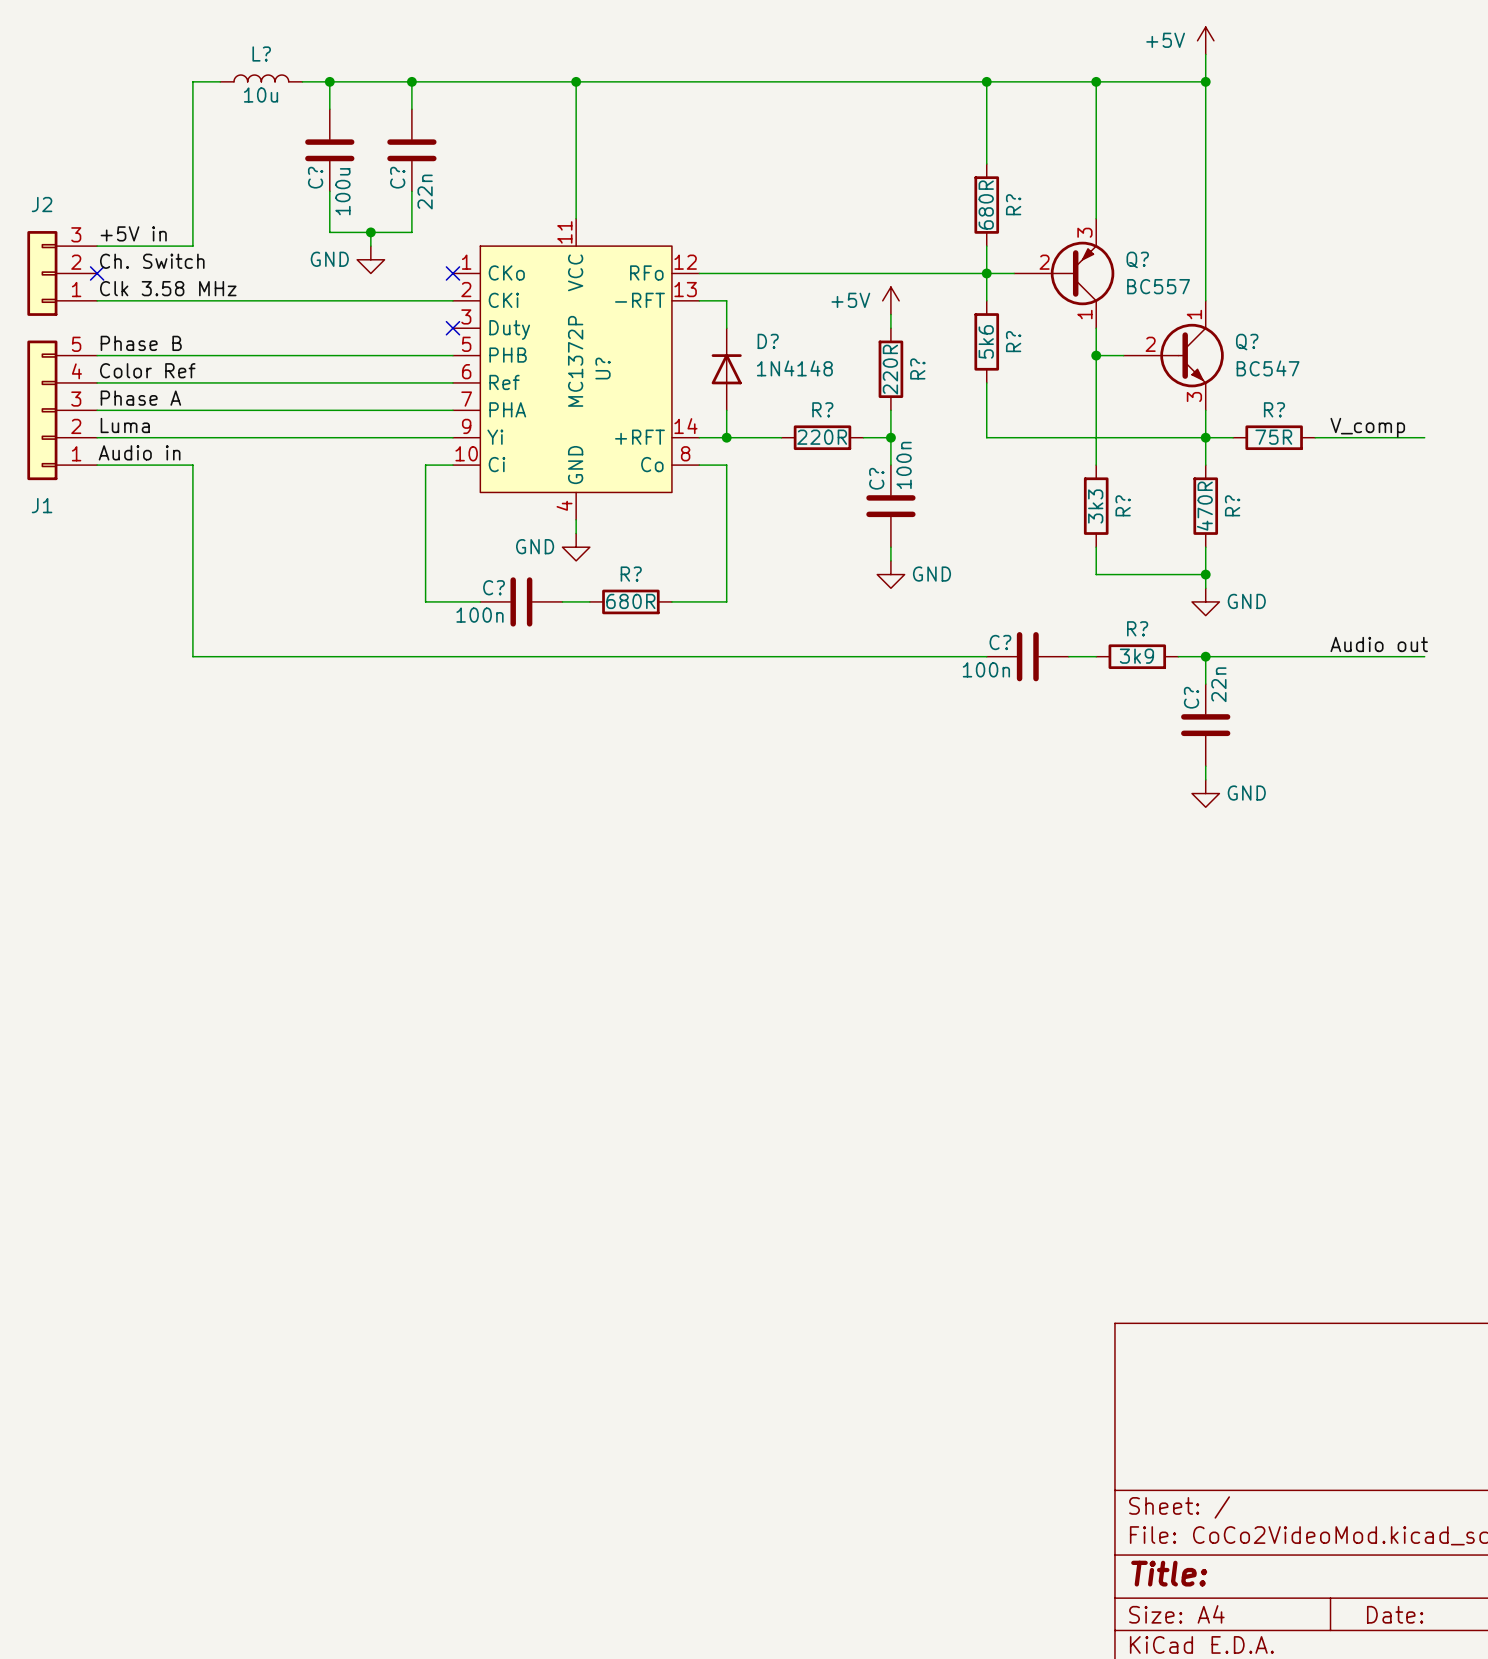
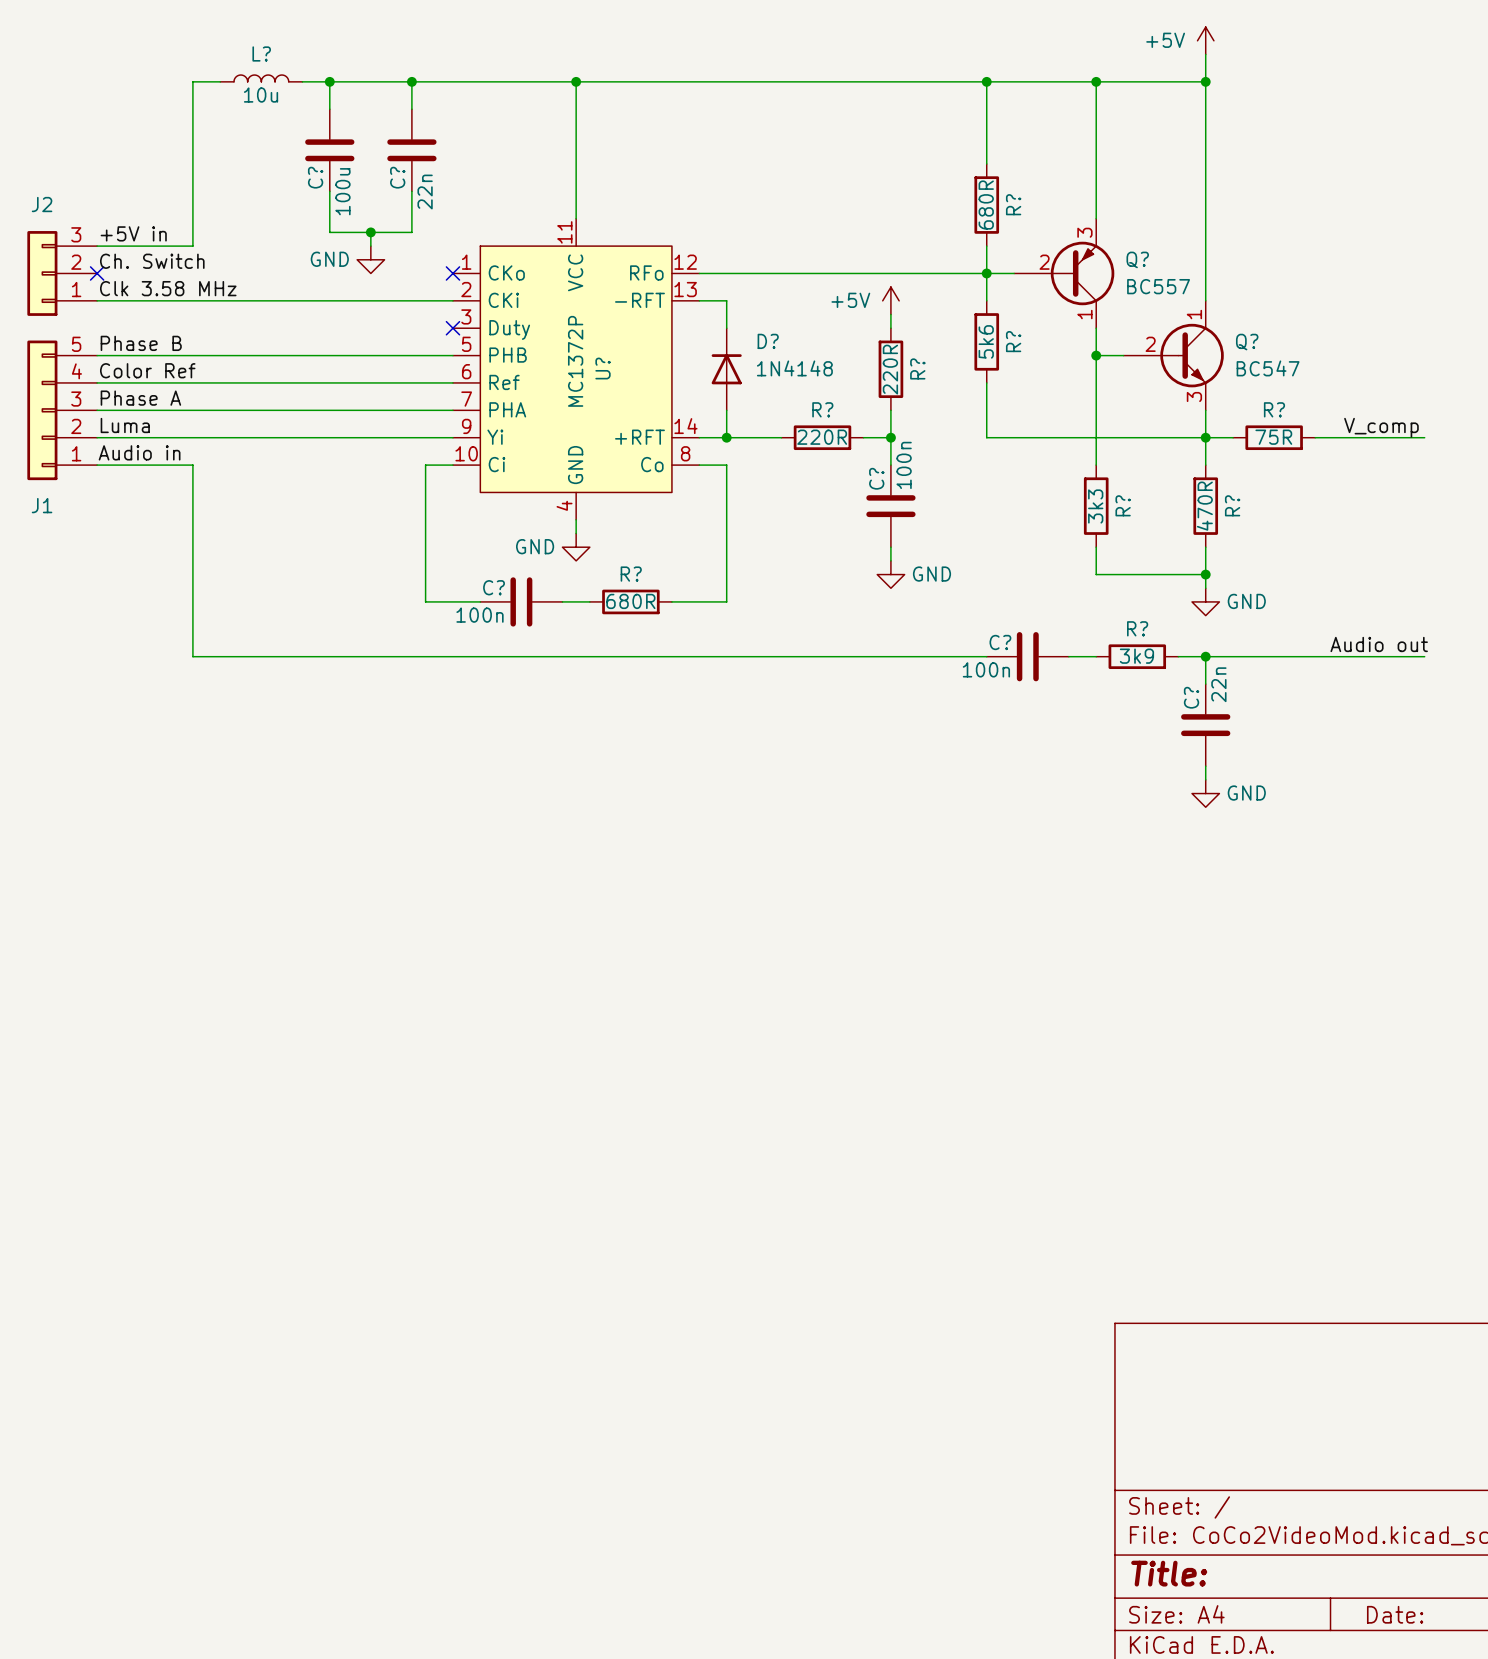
label position: V_comp (1367, 427) -> V_comp (1381, 427)

